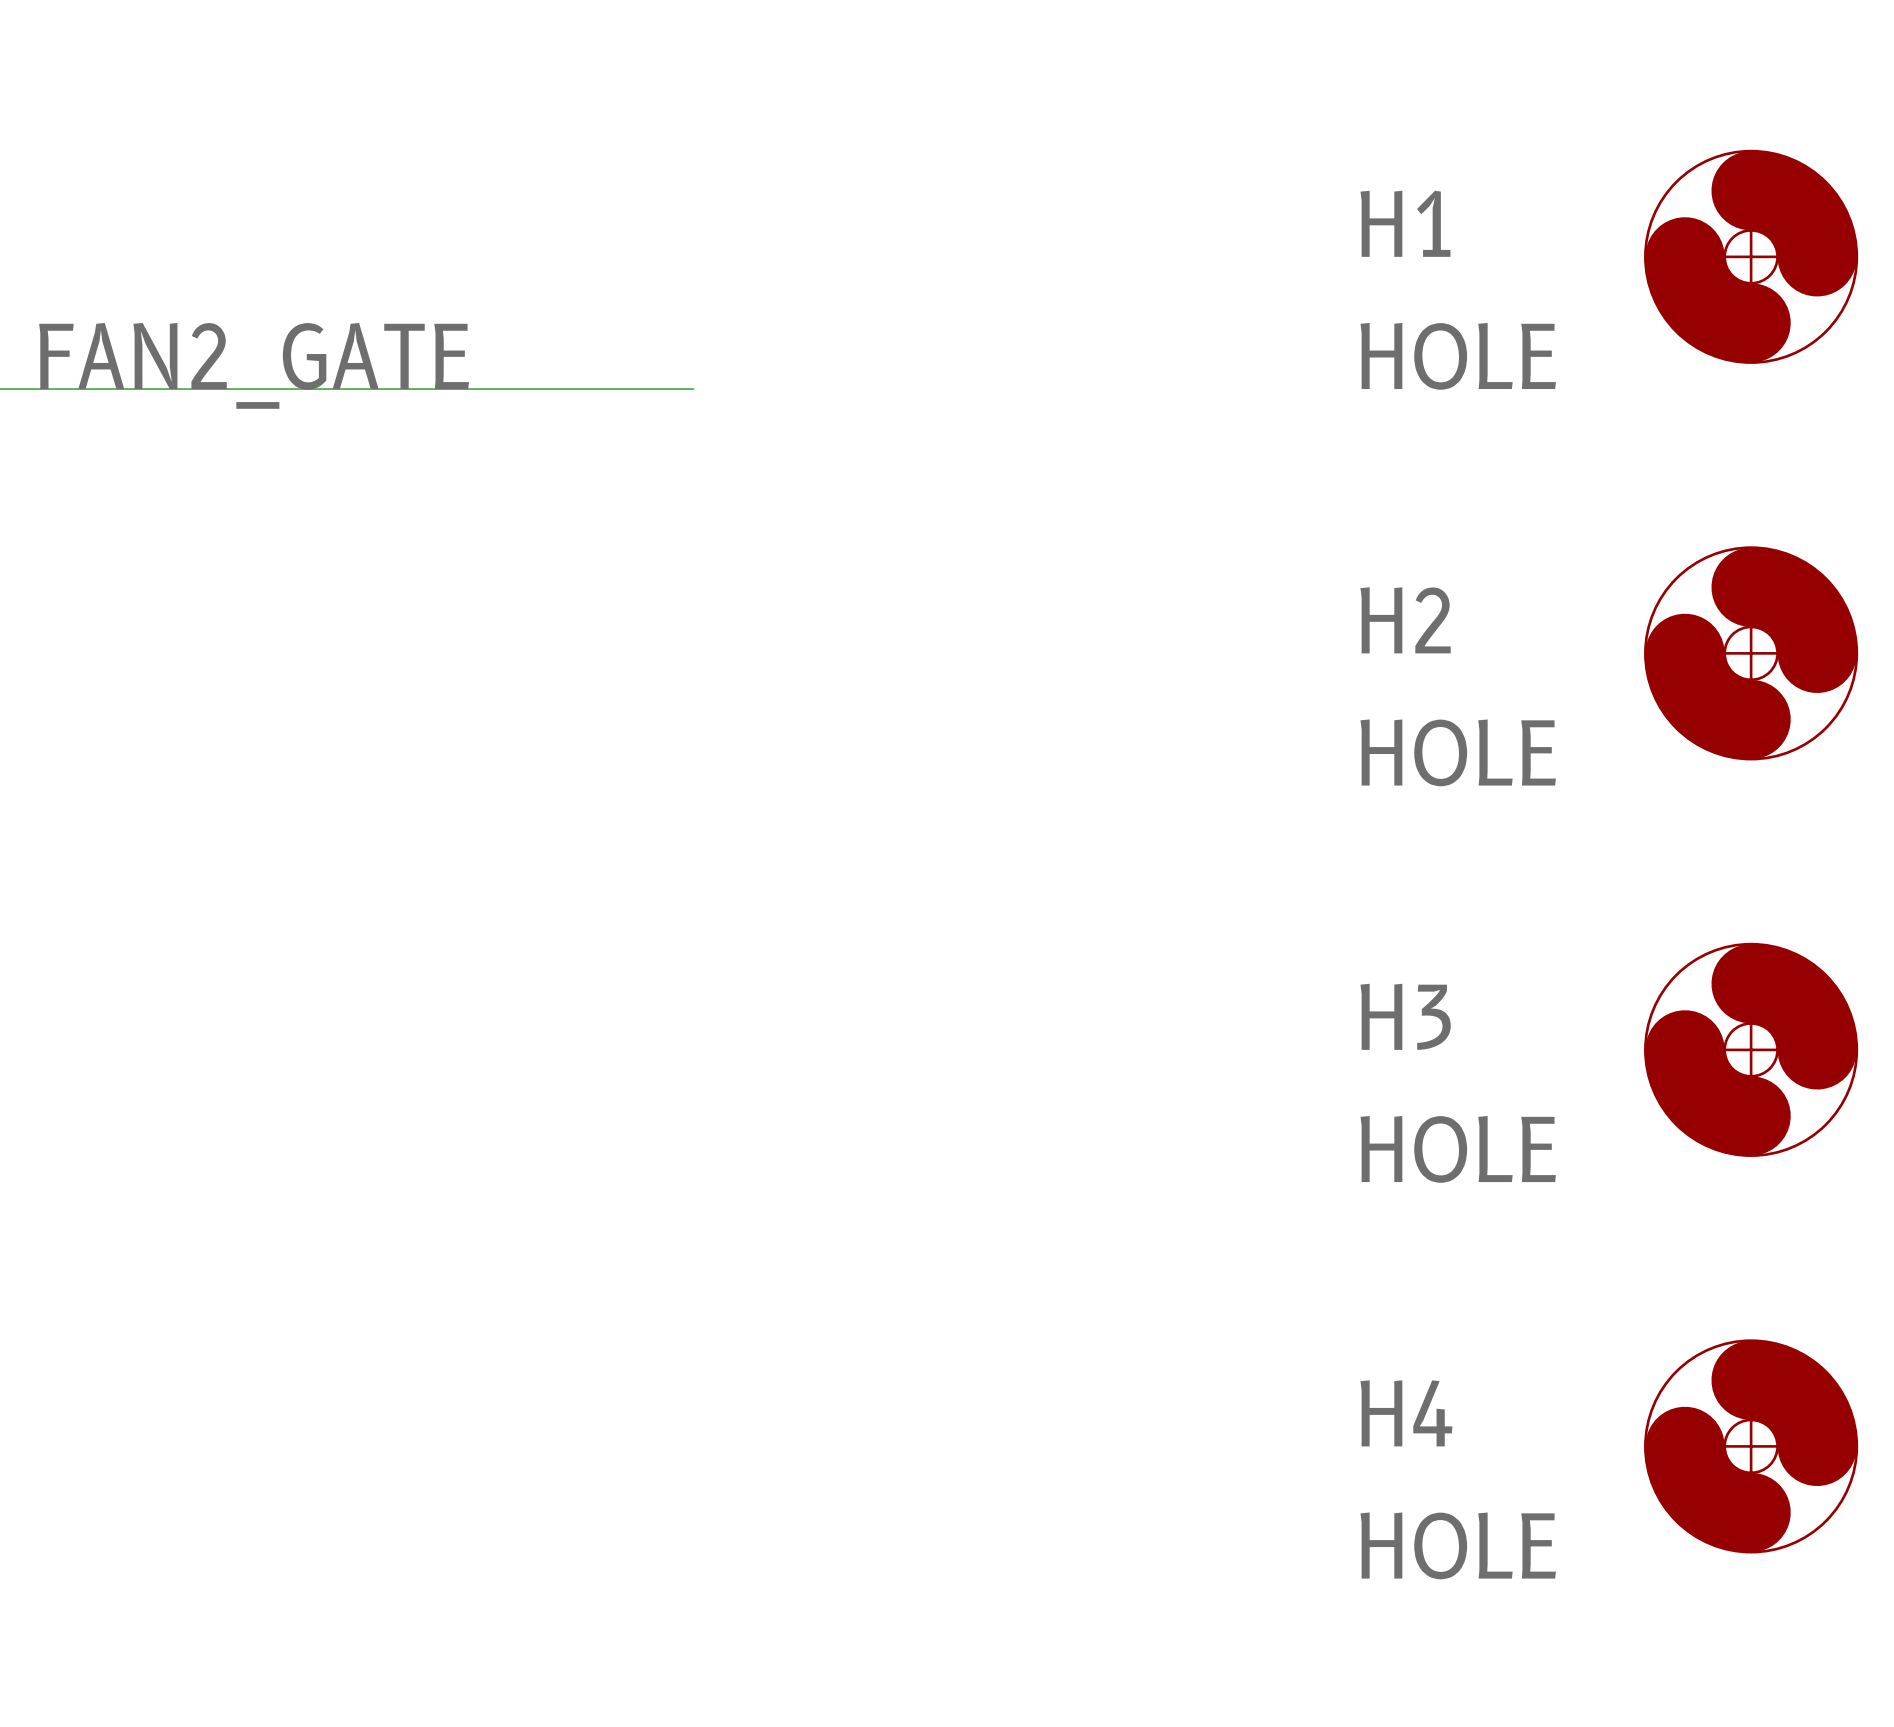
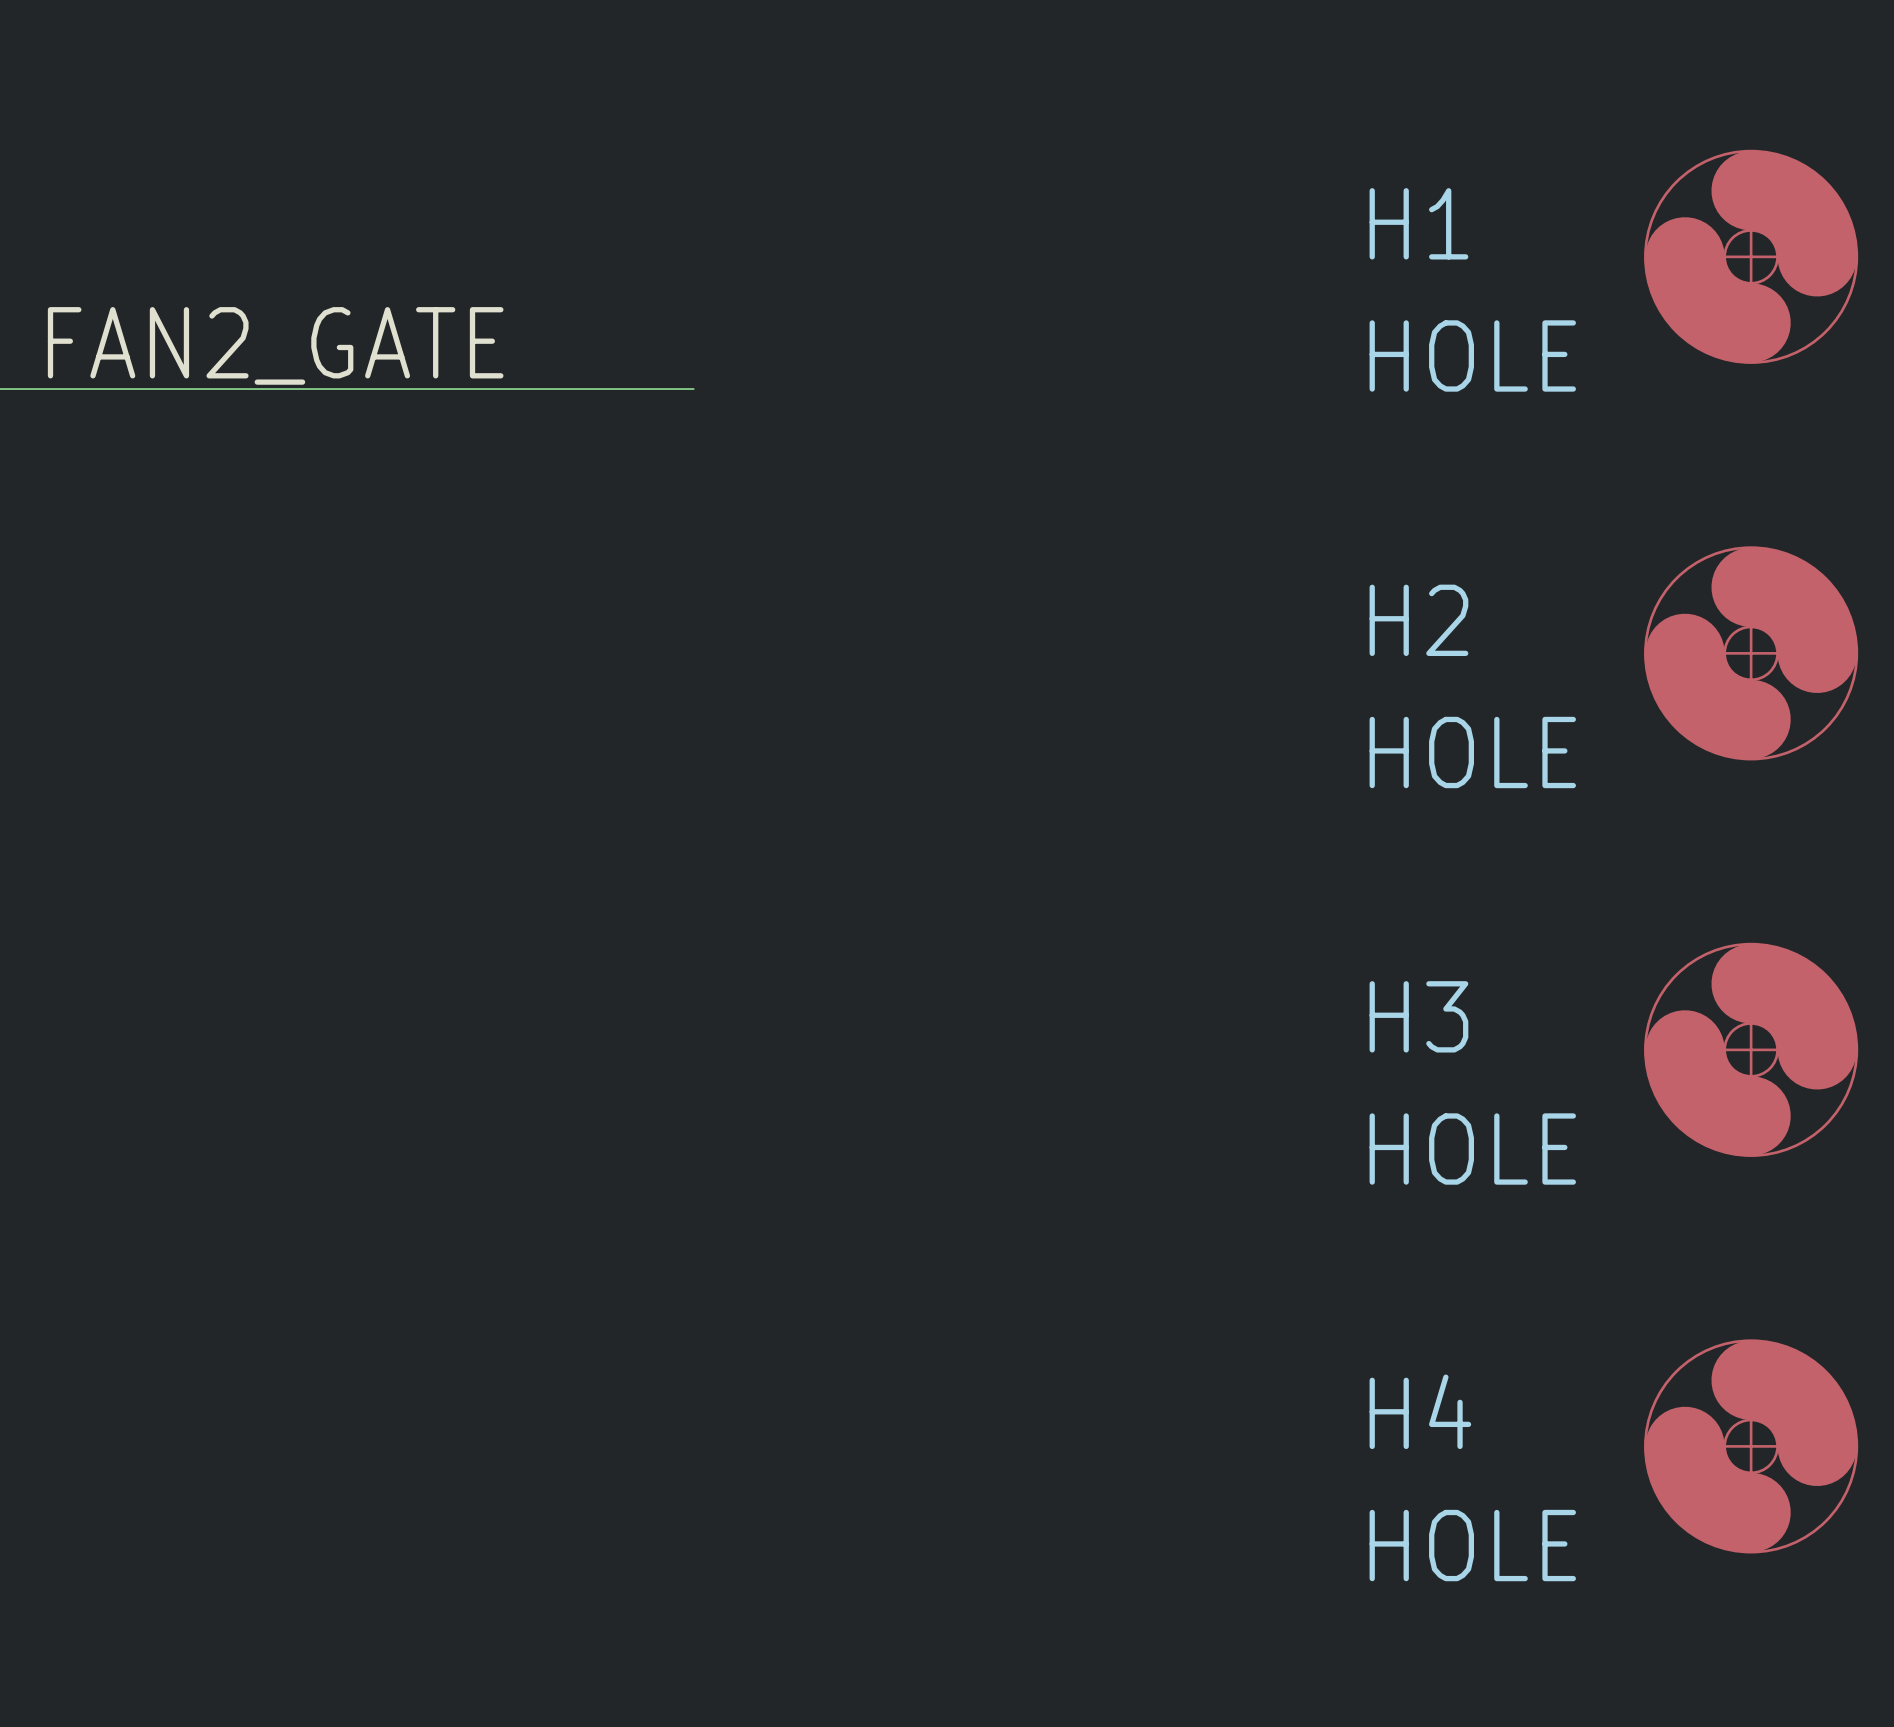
label position: FAN2_GATE (254, 365) -> FAN2_GATE (275, 345)

